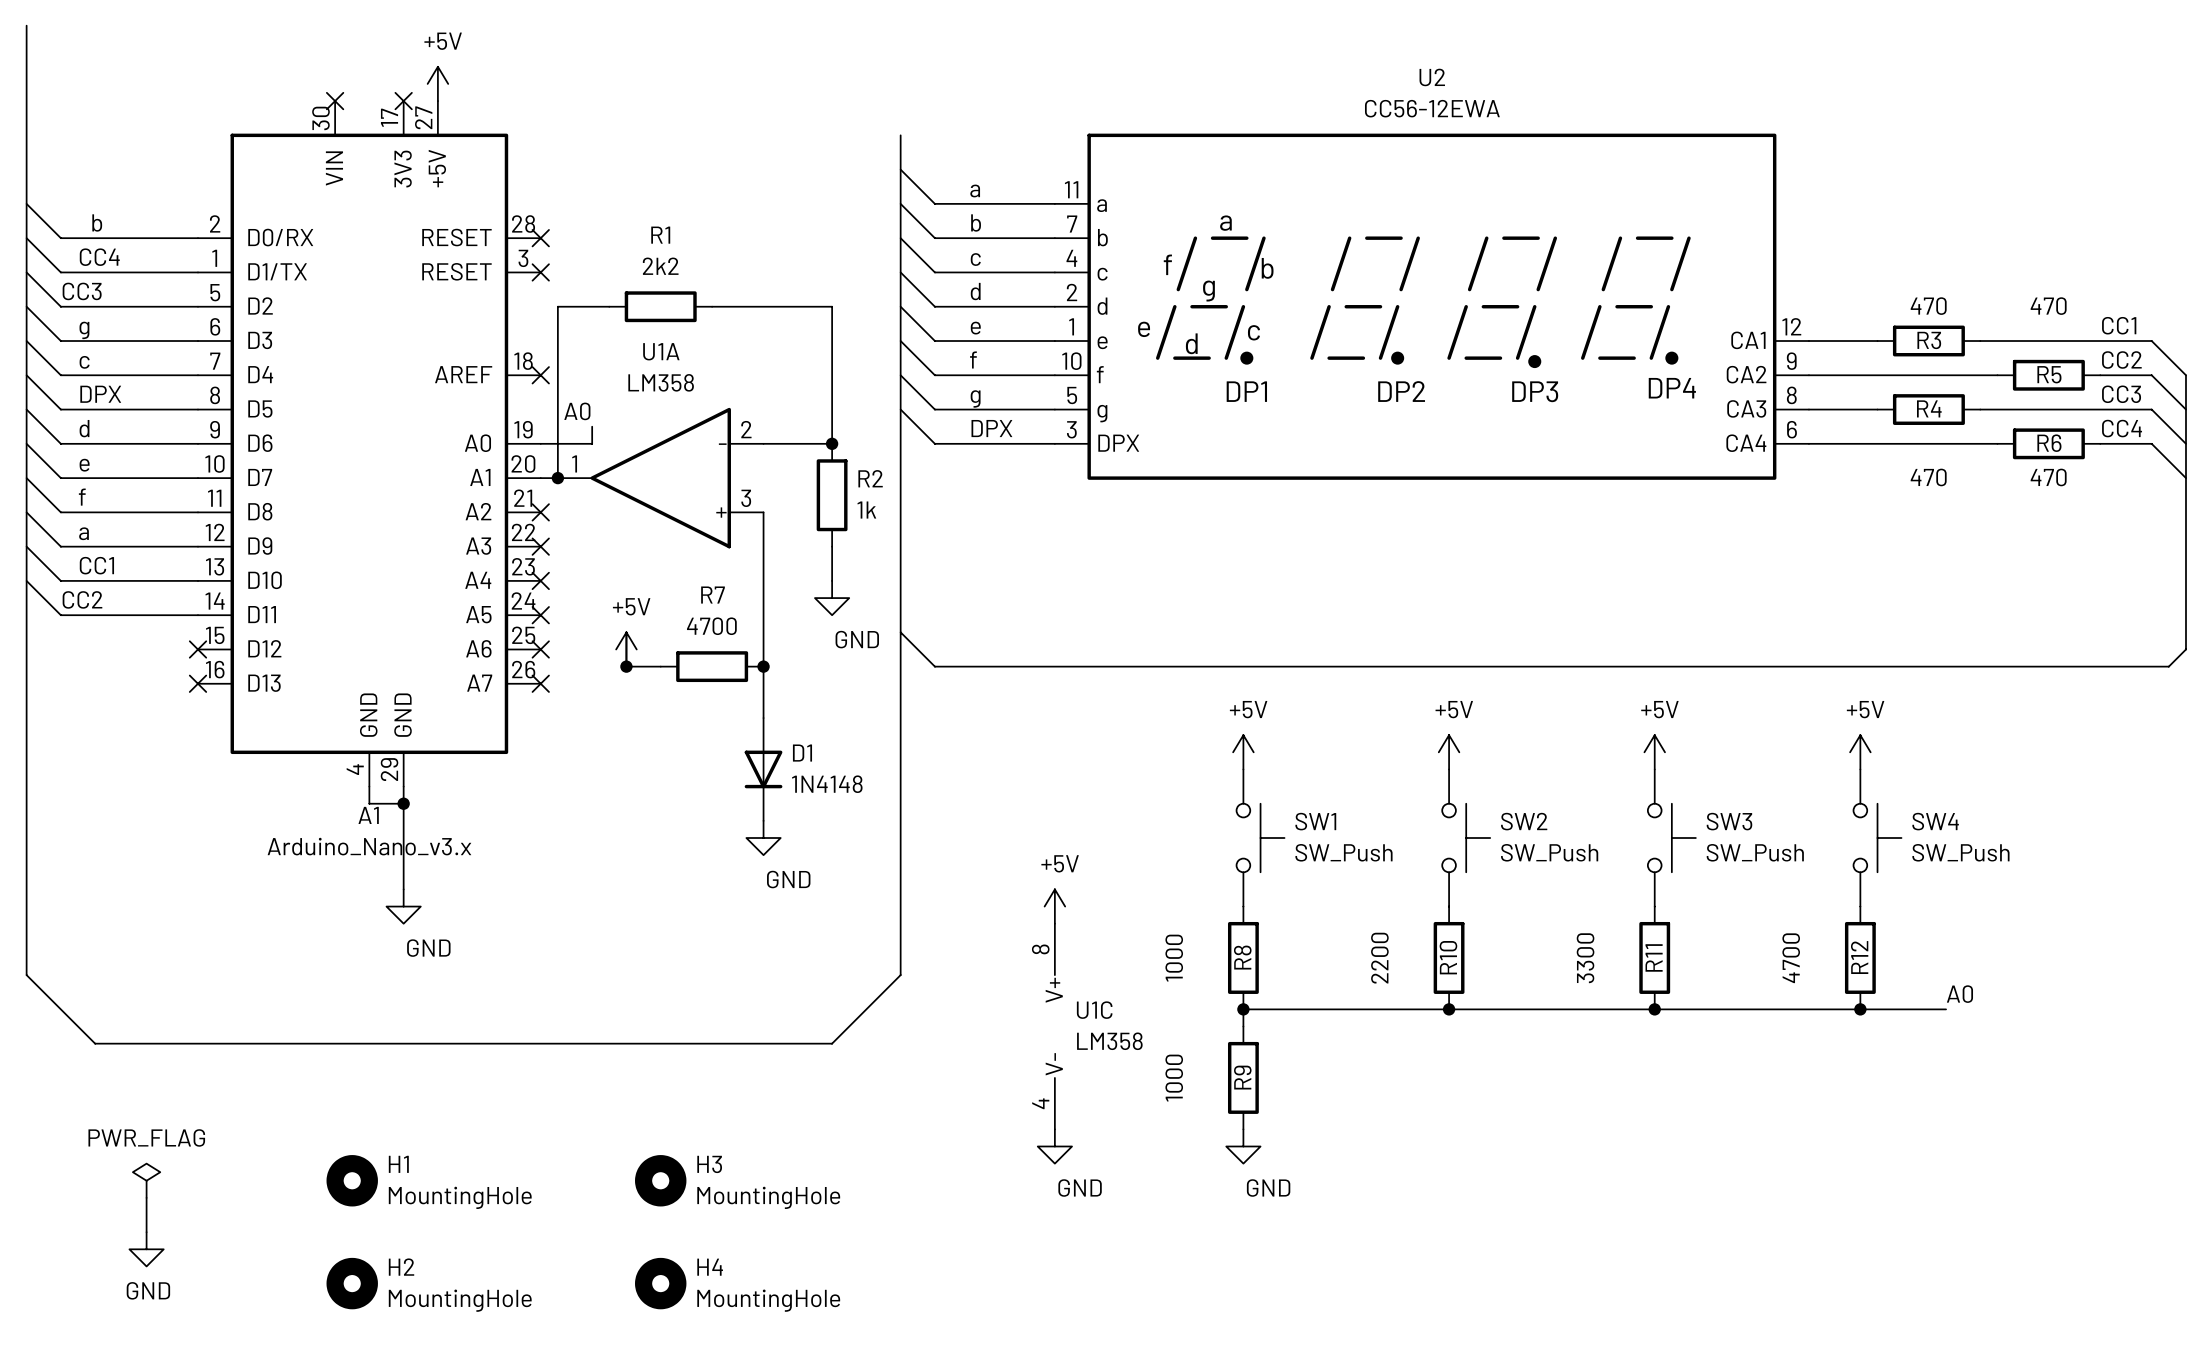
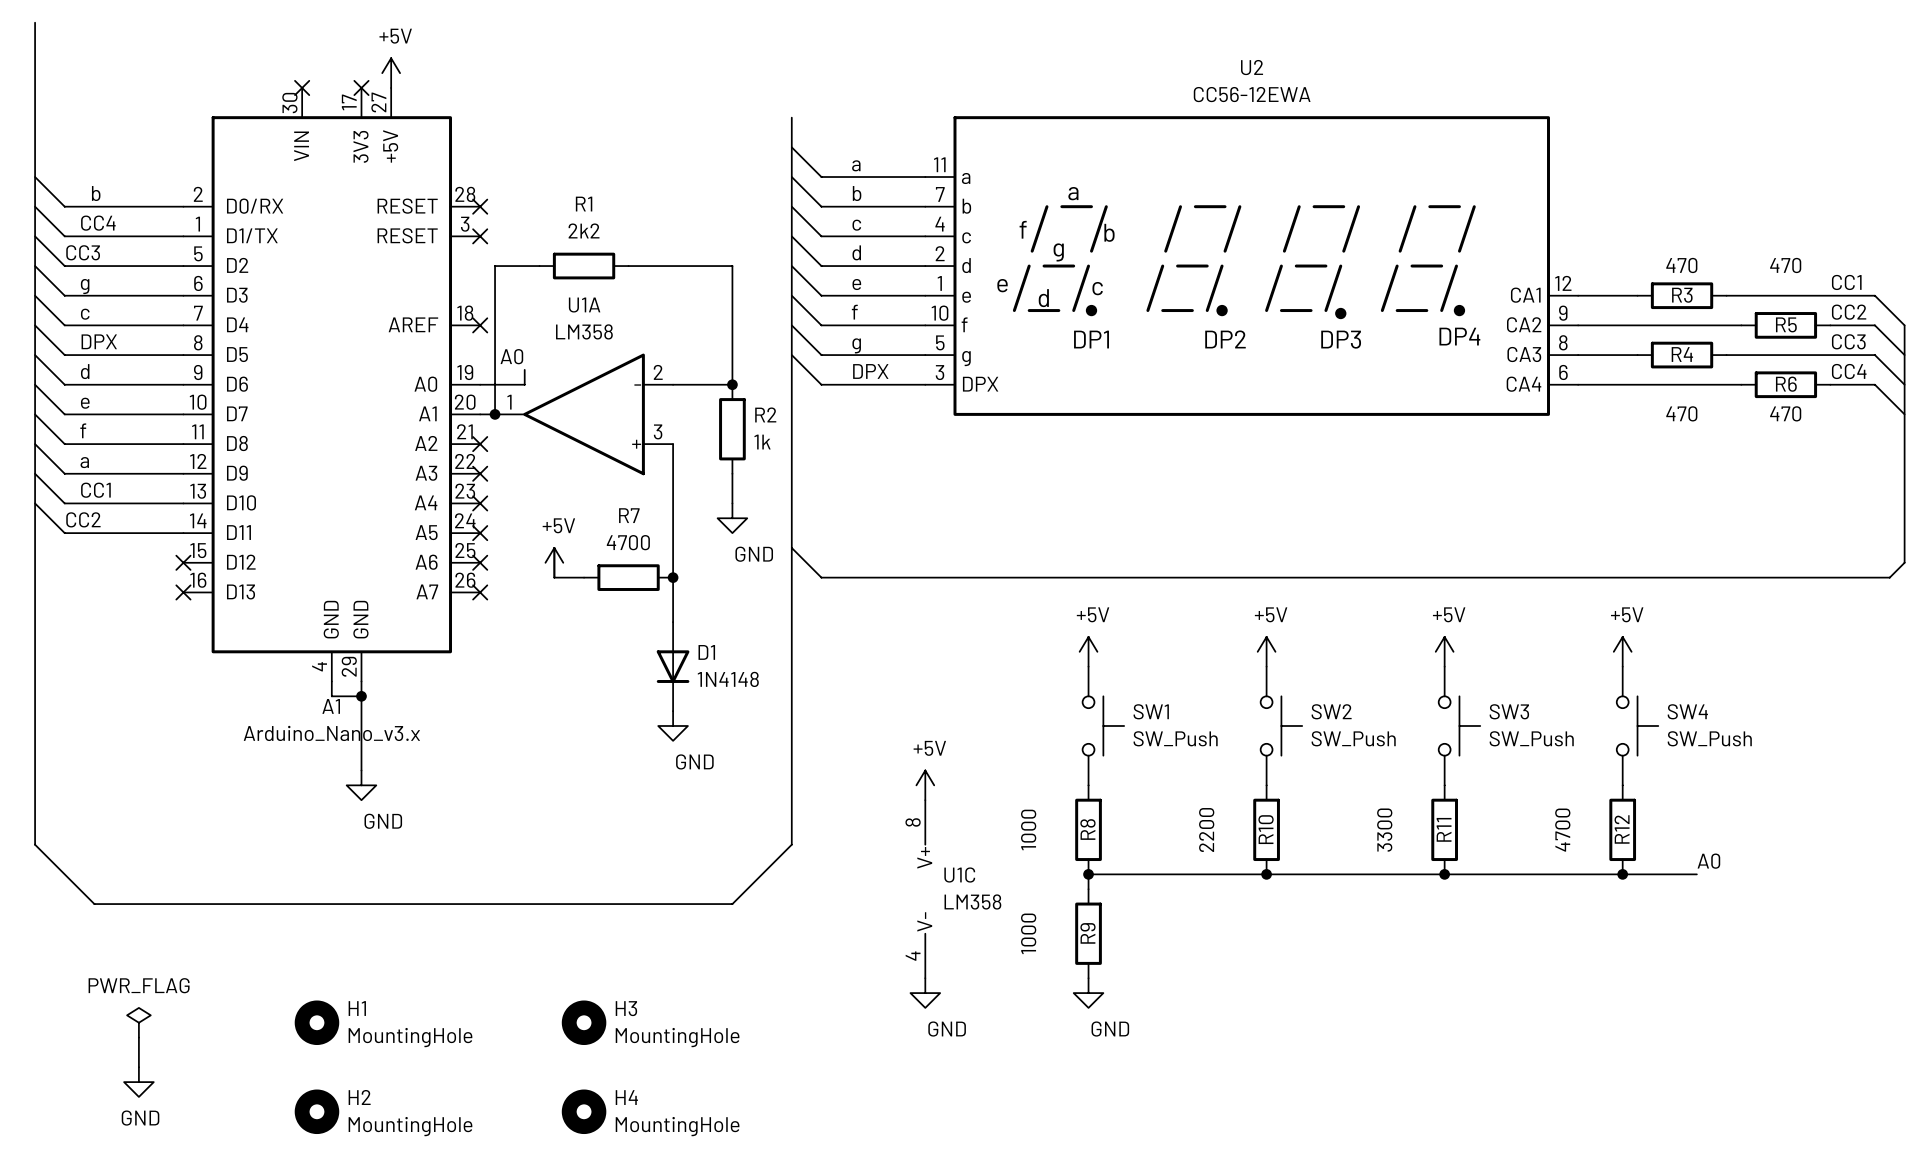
junction: (626, 666) -> none

